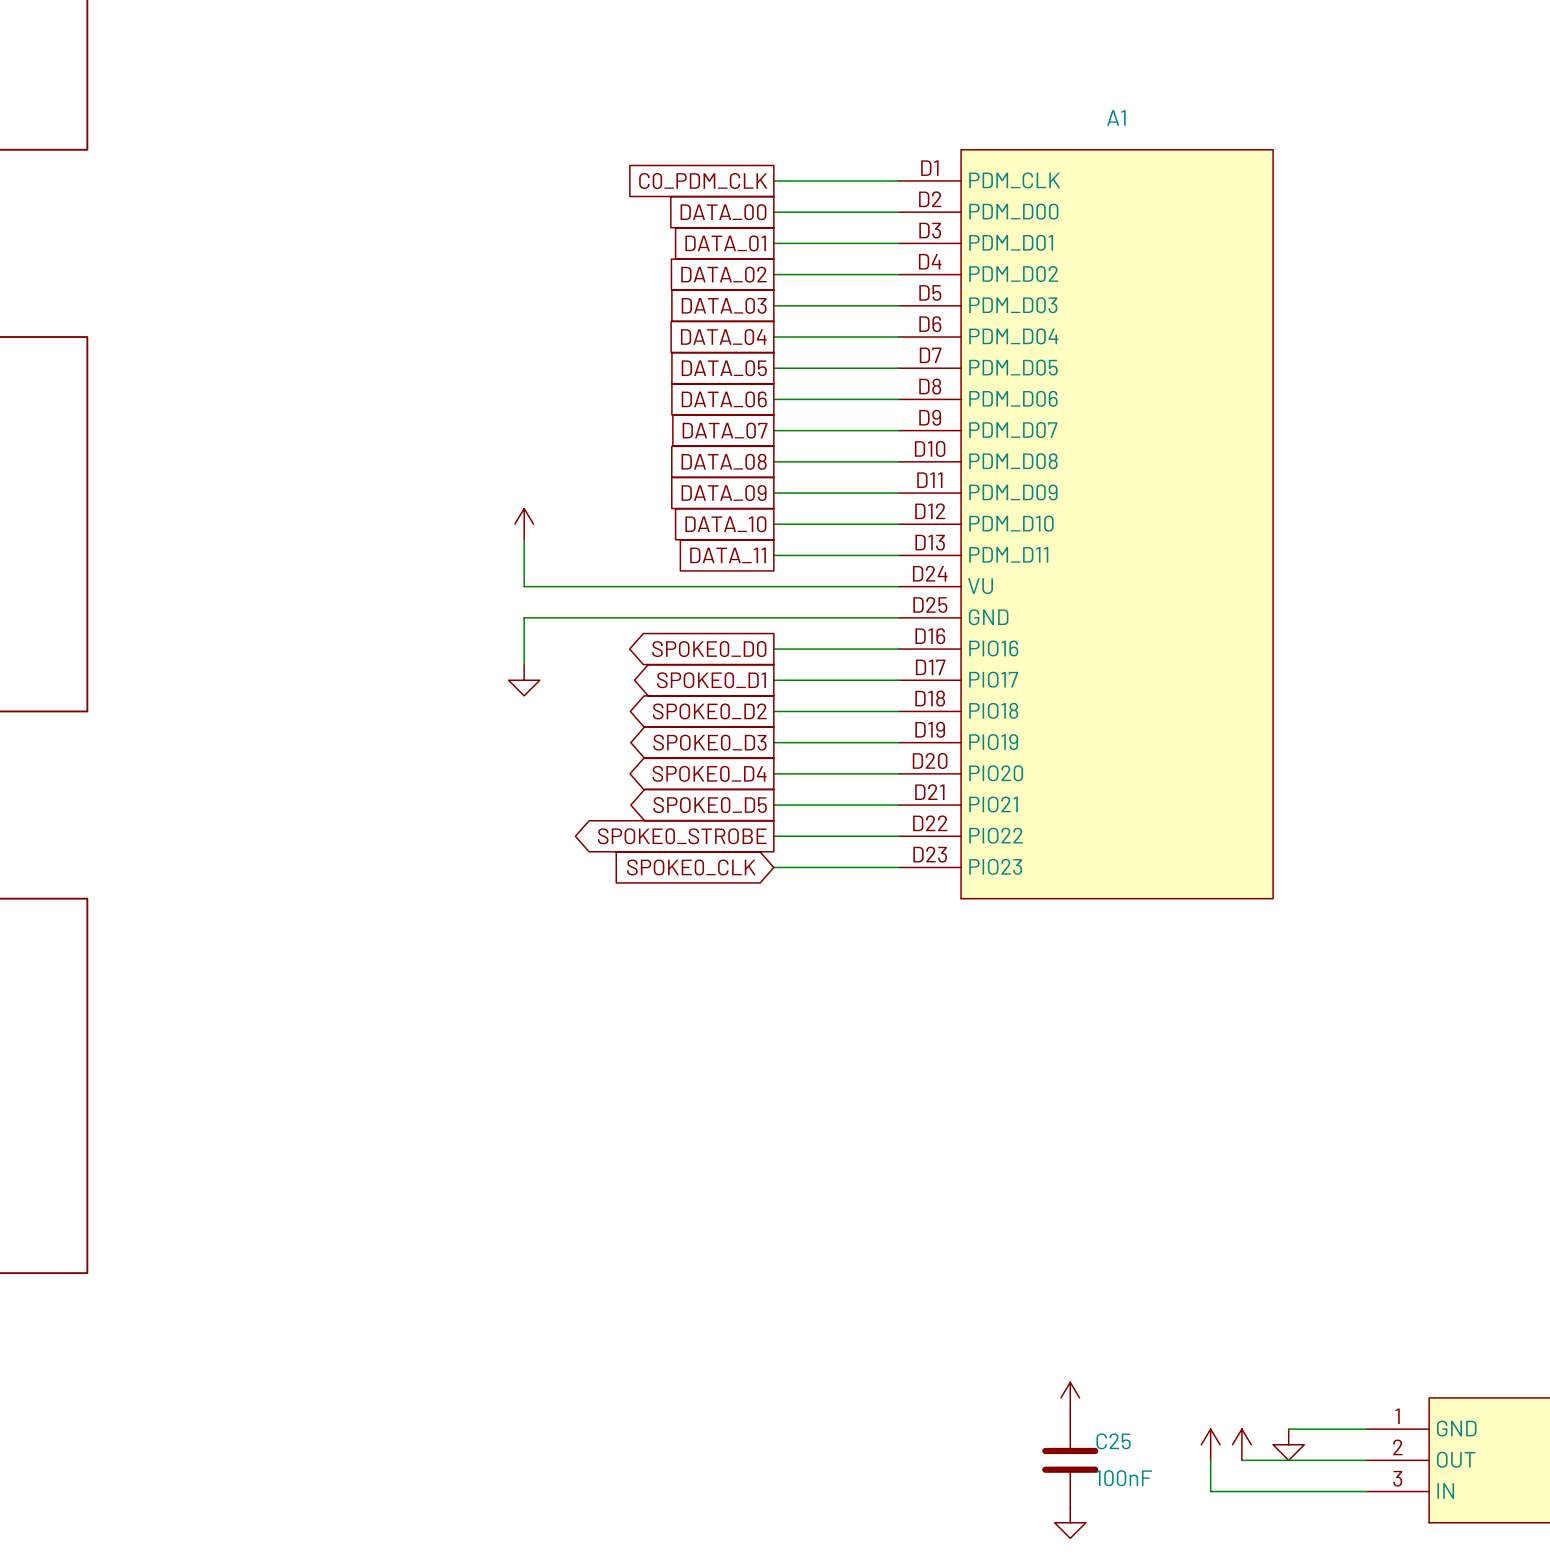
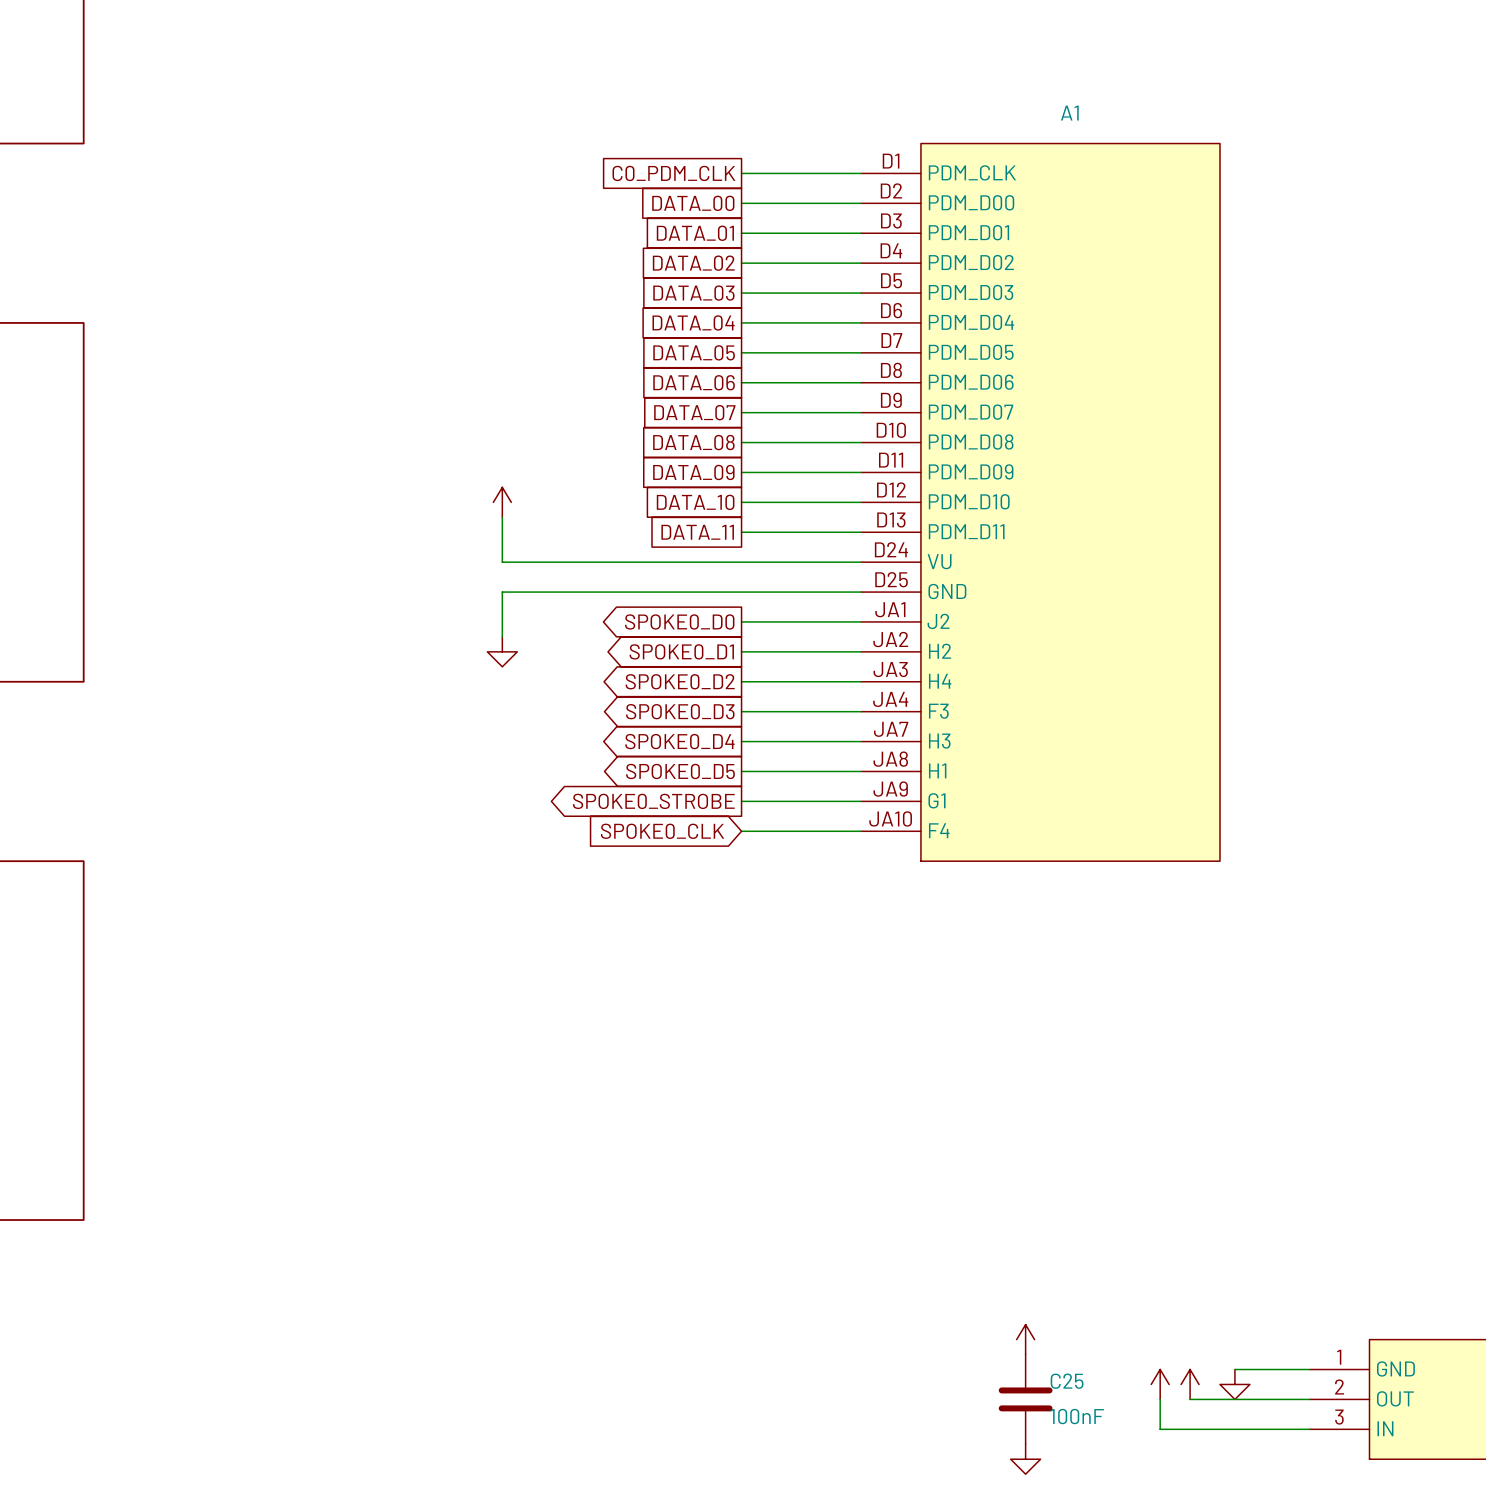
A1 symbol: [898, 149, 1274, 899] -> [861, 143, 1220, 862]

